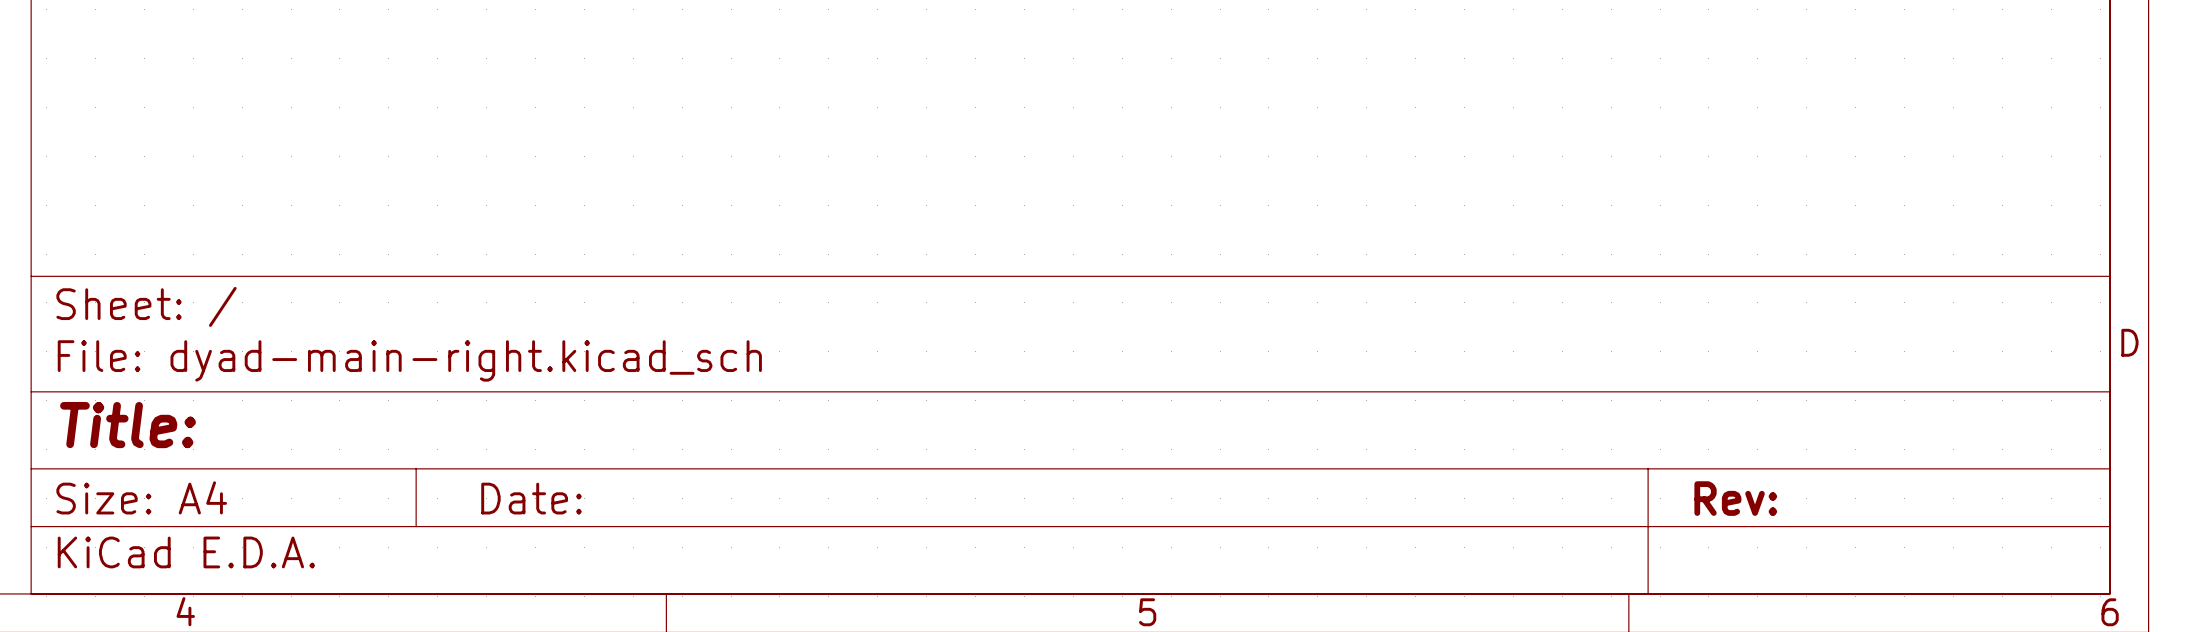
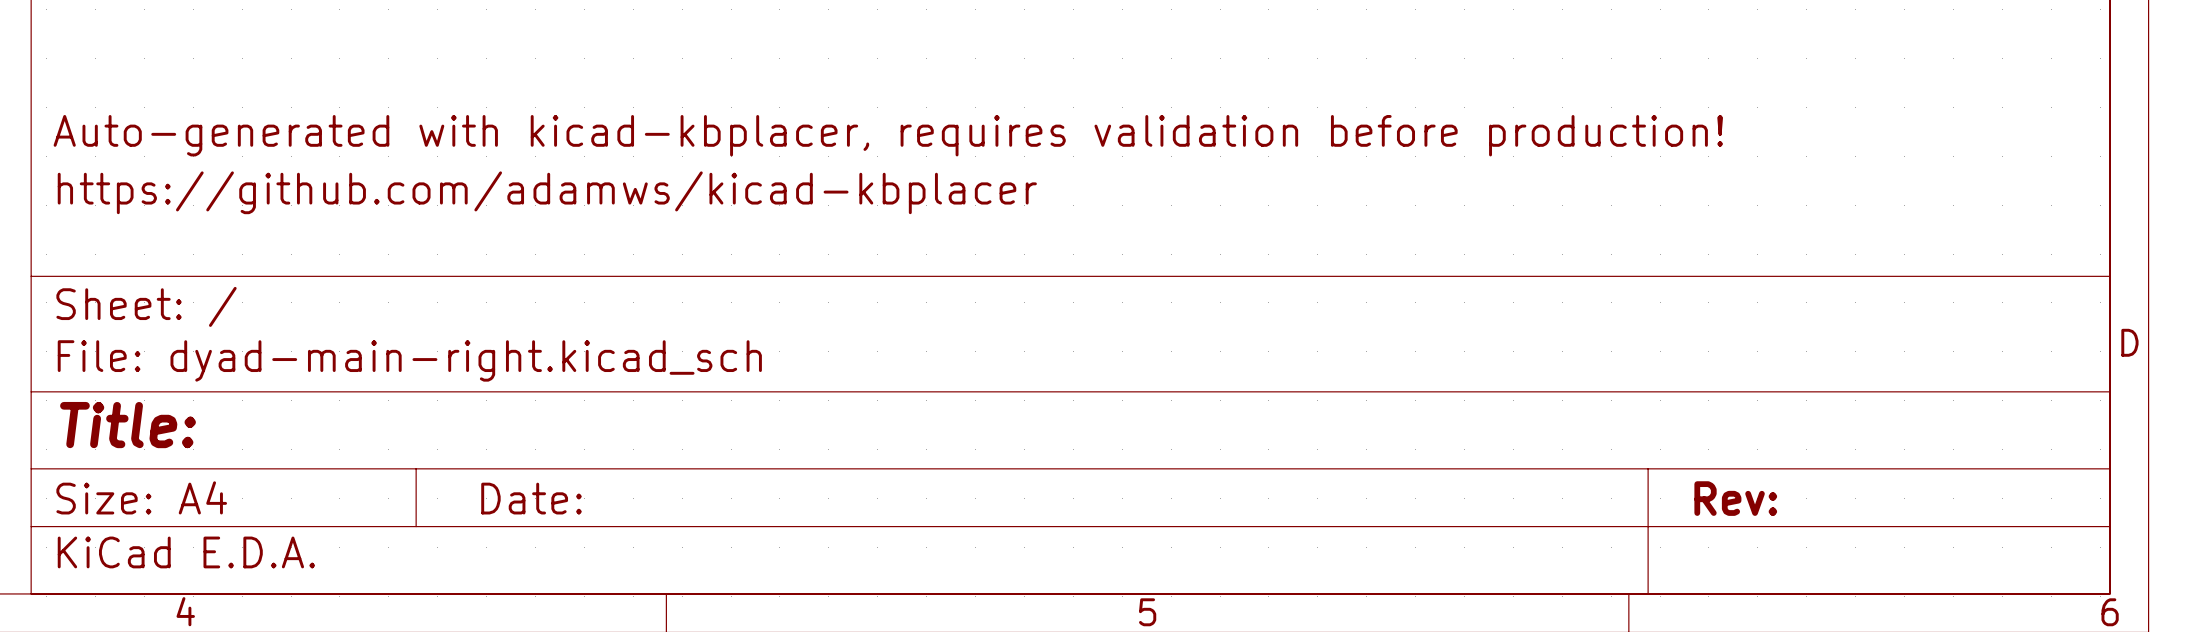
title block: none -> Auto-generated with kicad-kbplacer, requires validation before production! (888, 135)
title block: none -> https://github.com/adamws/kicad-kbplacer (547, 192)

